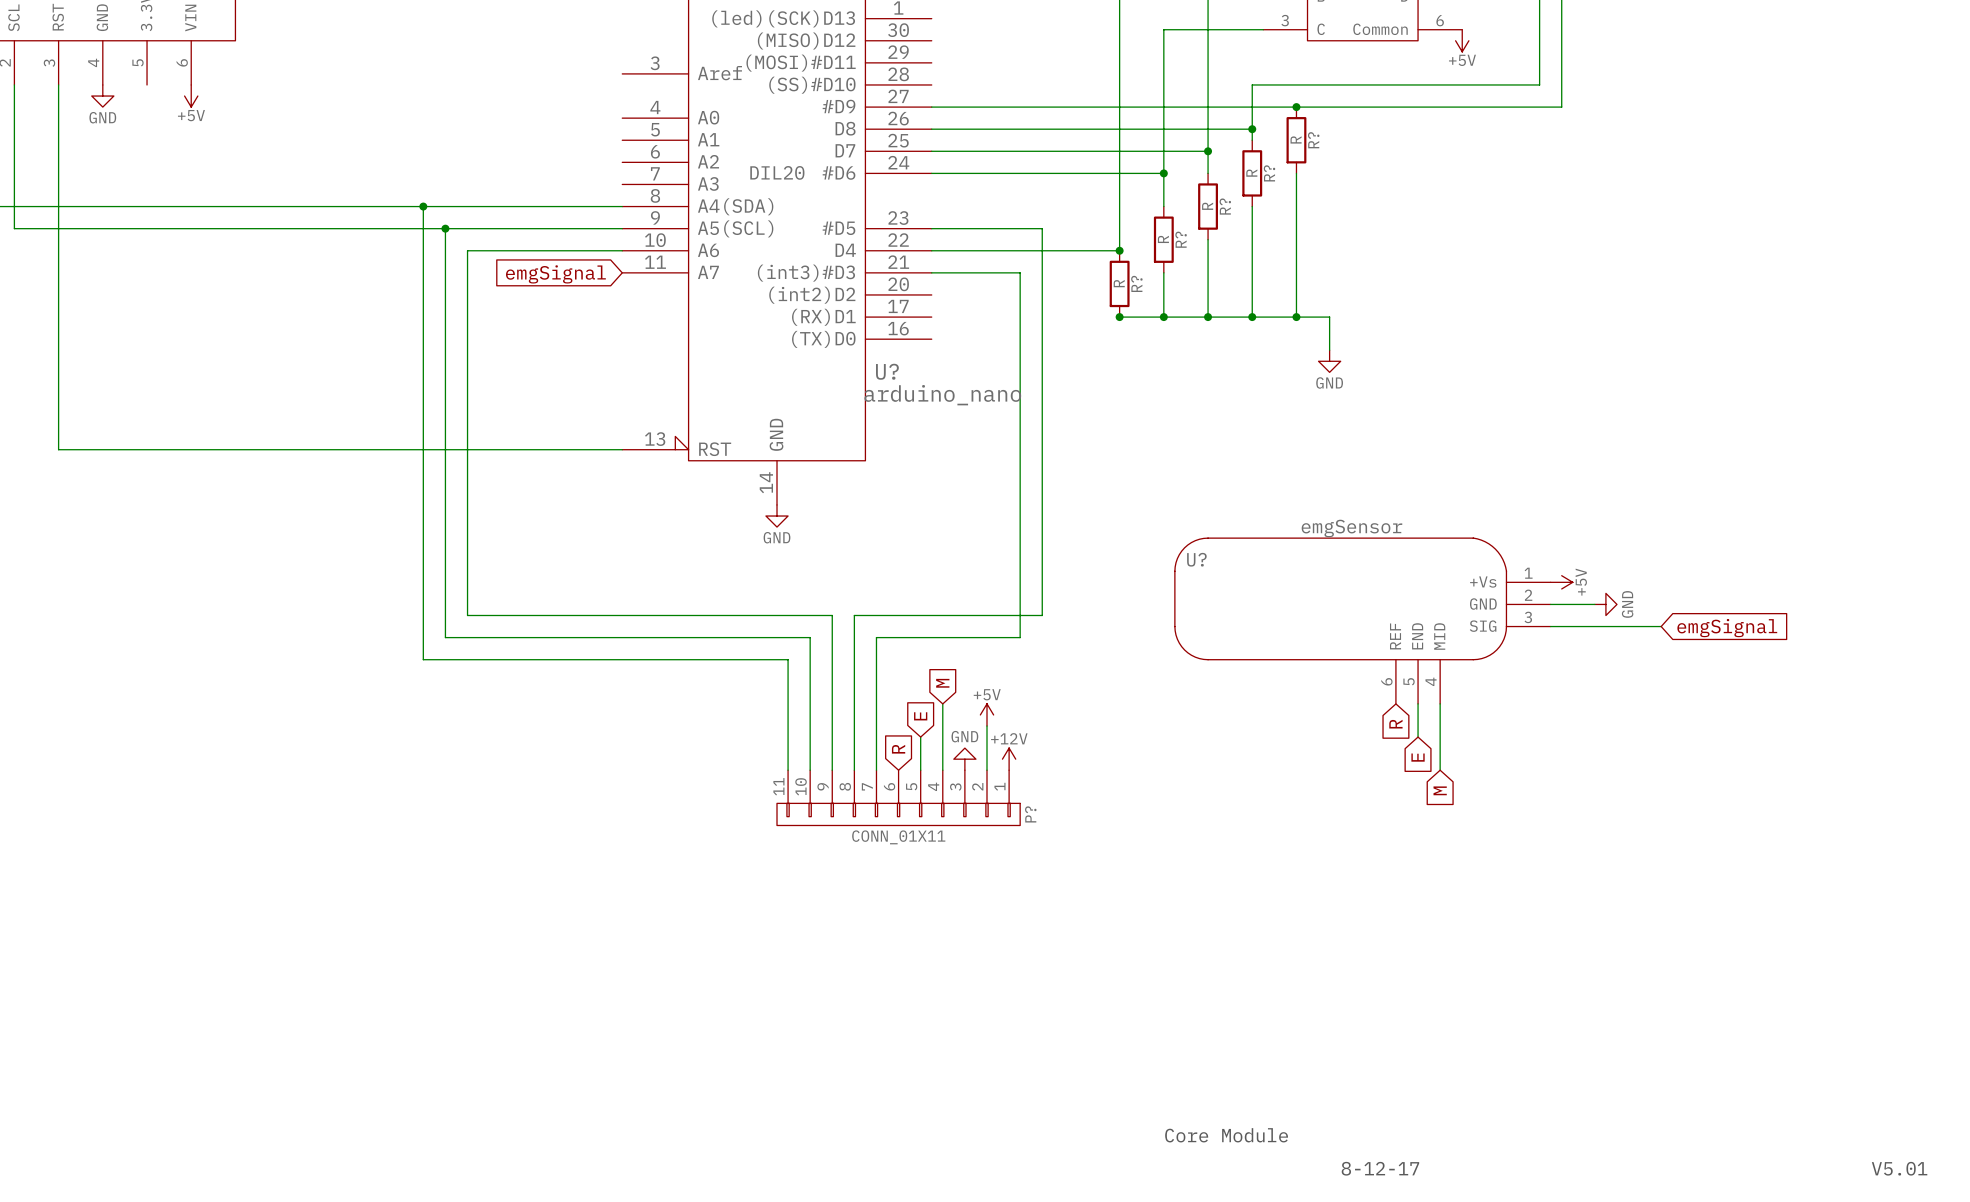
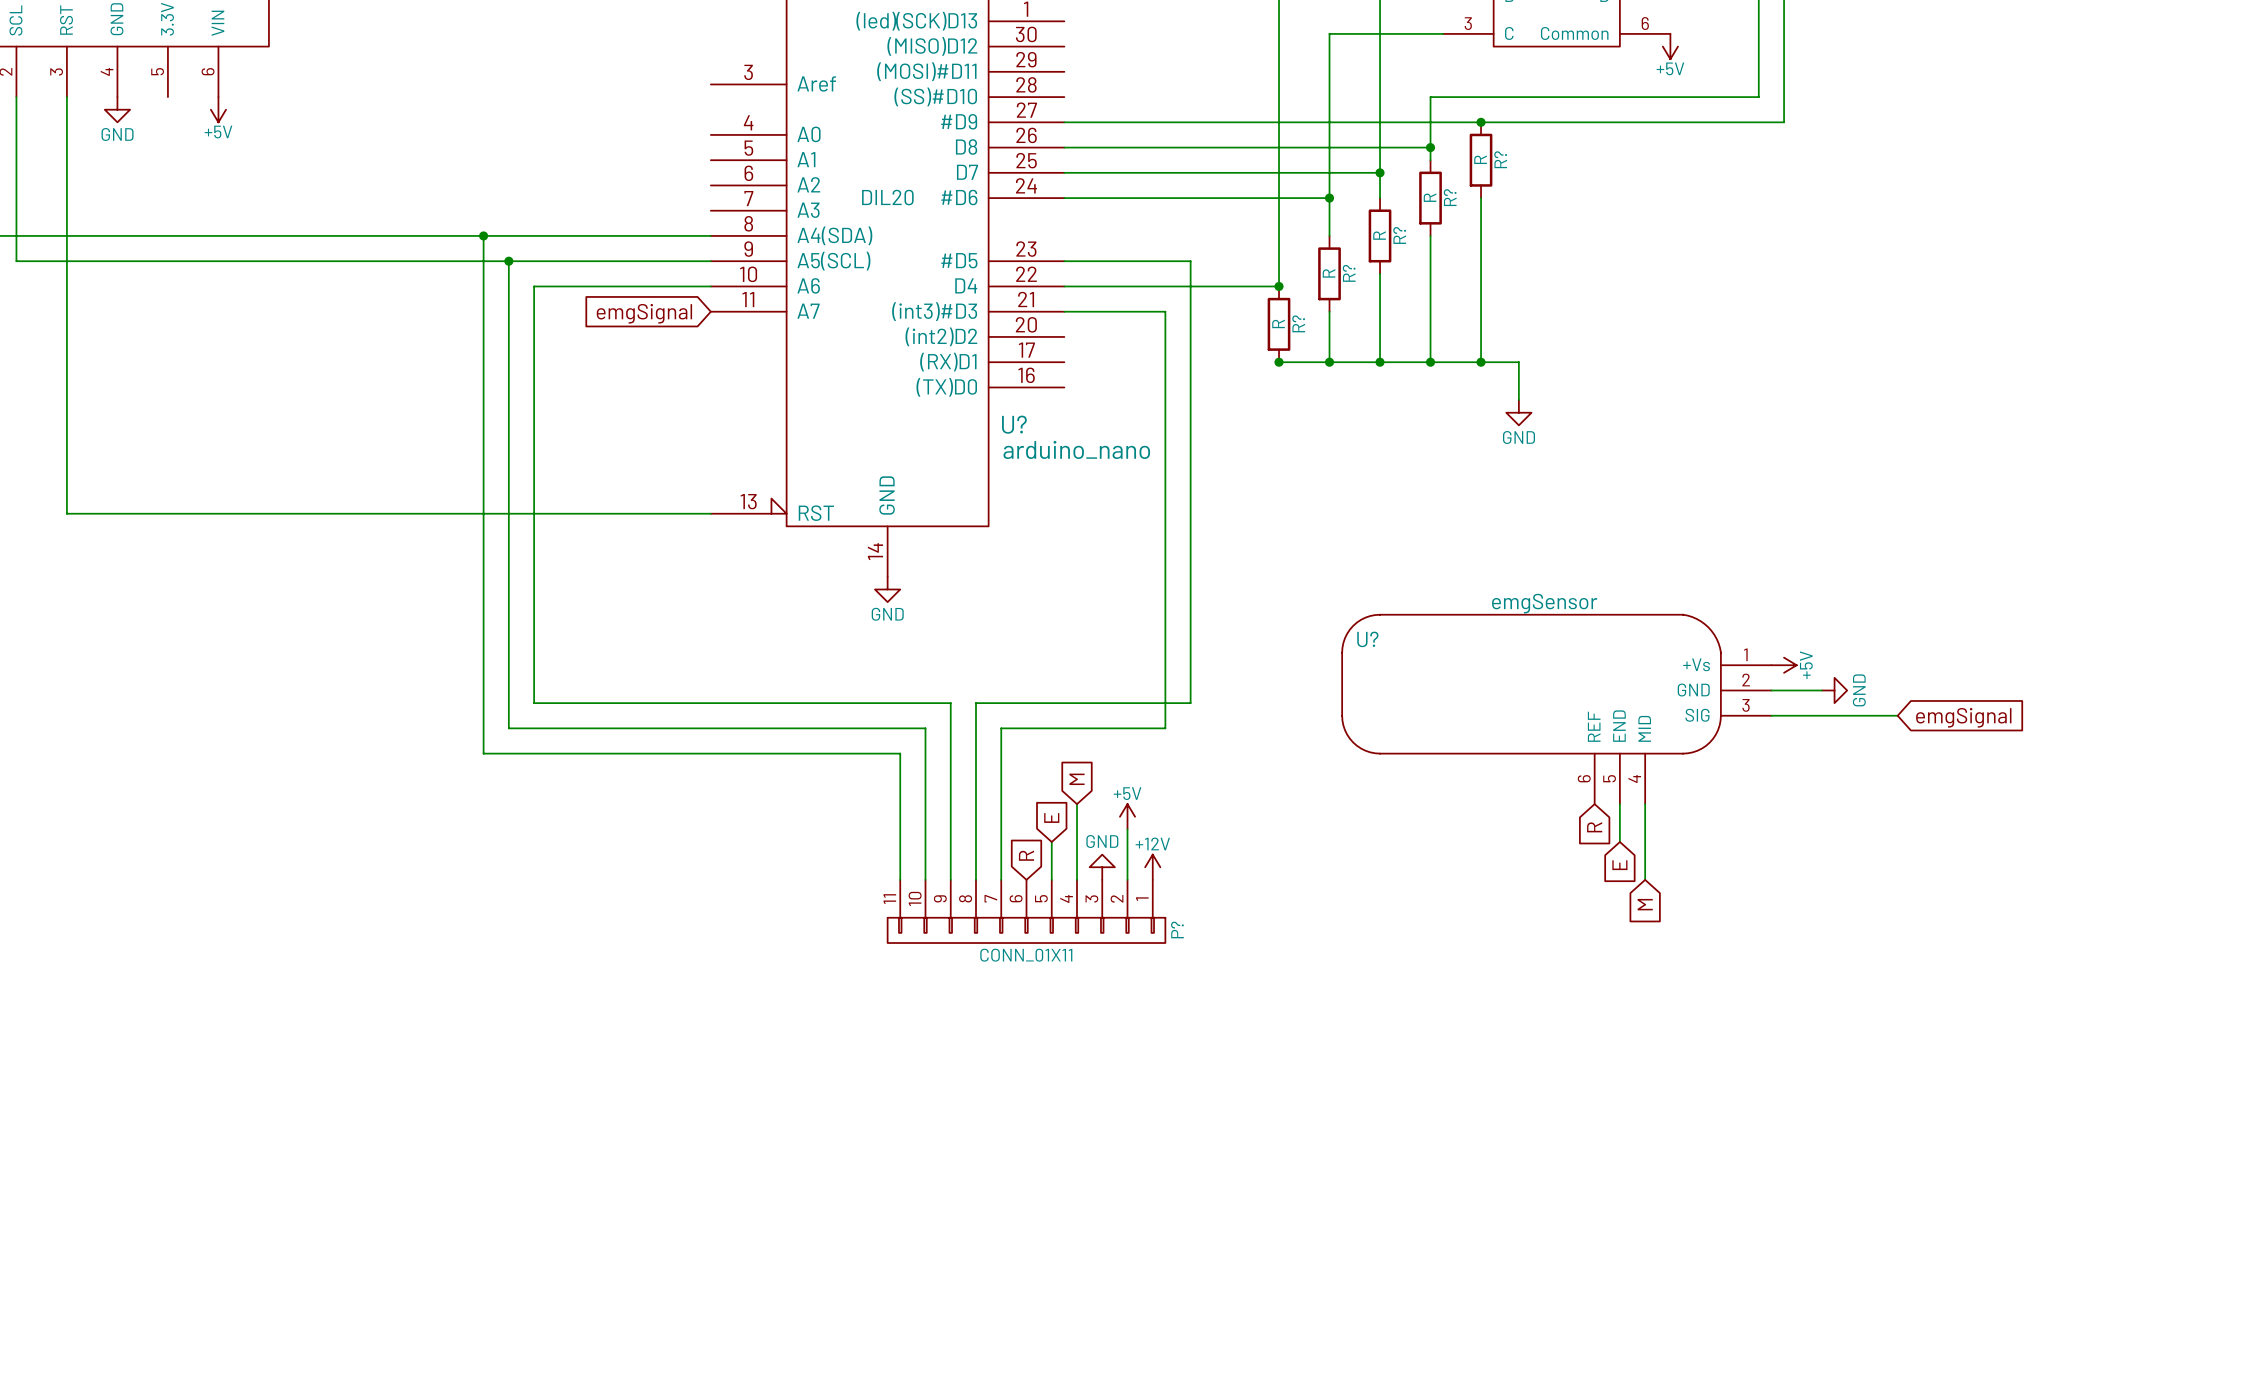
text: Core Module (1226, 1135) -> none
text: 8-12-17 (1380, 1168) -> none
text: V5.01 (1899, 1168) -> none

